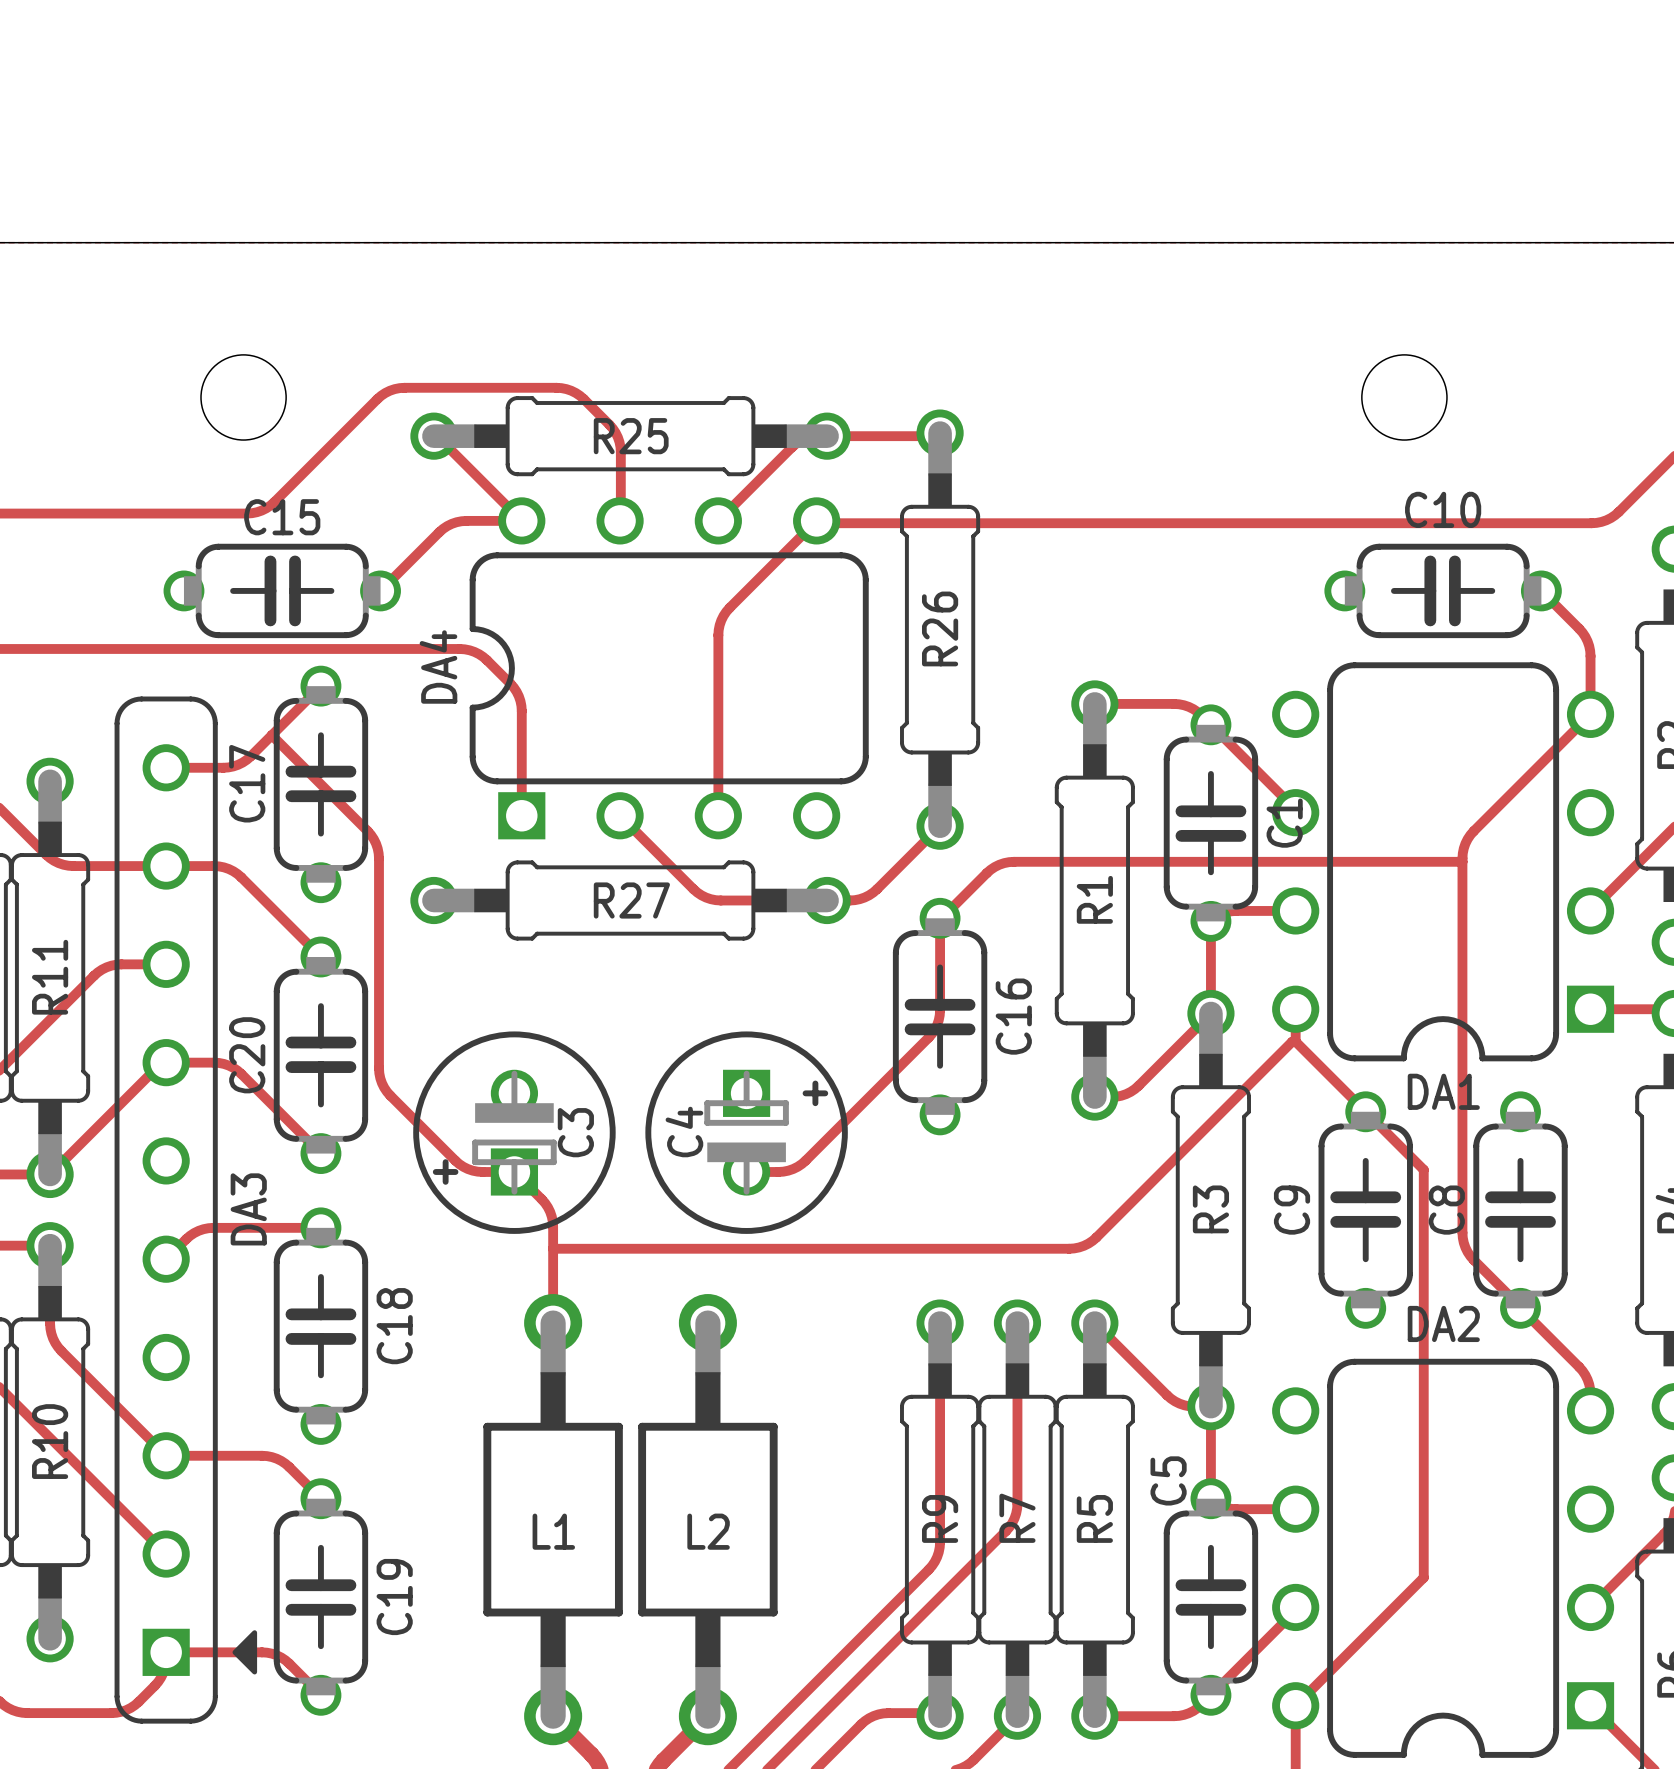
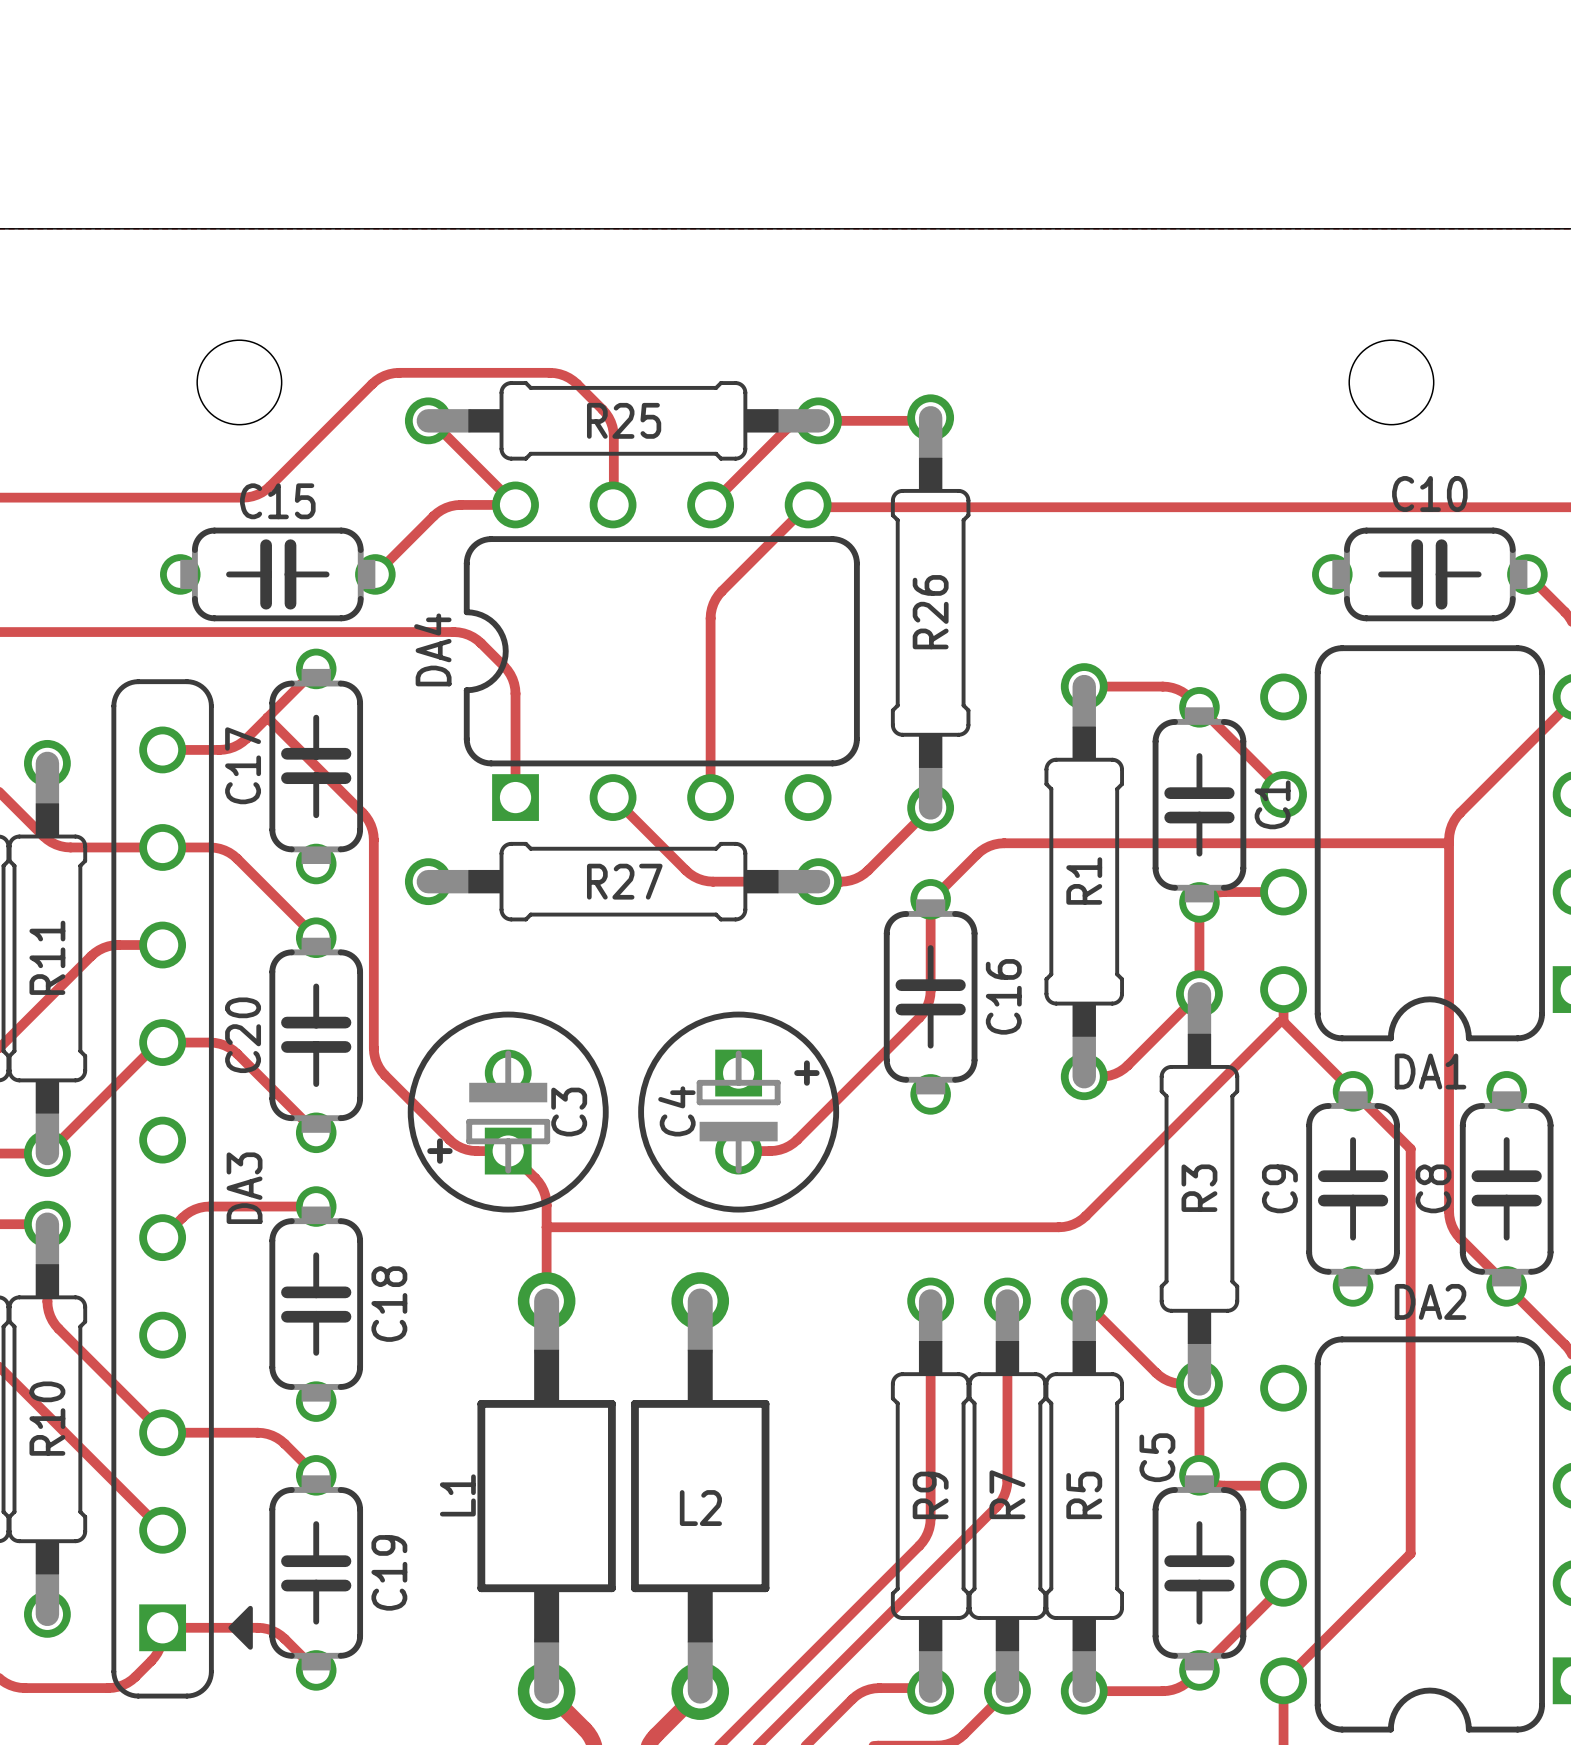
L1 name rotation: 0° (553, 1531) -> 90° counterclockwise (457, 1495)
L1 name position: L1 (553, 1531) -> L1 (457, 1495)

